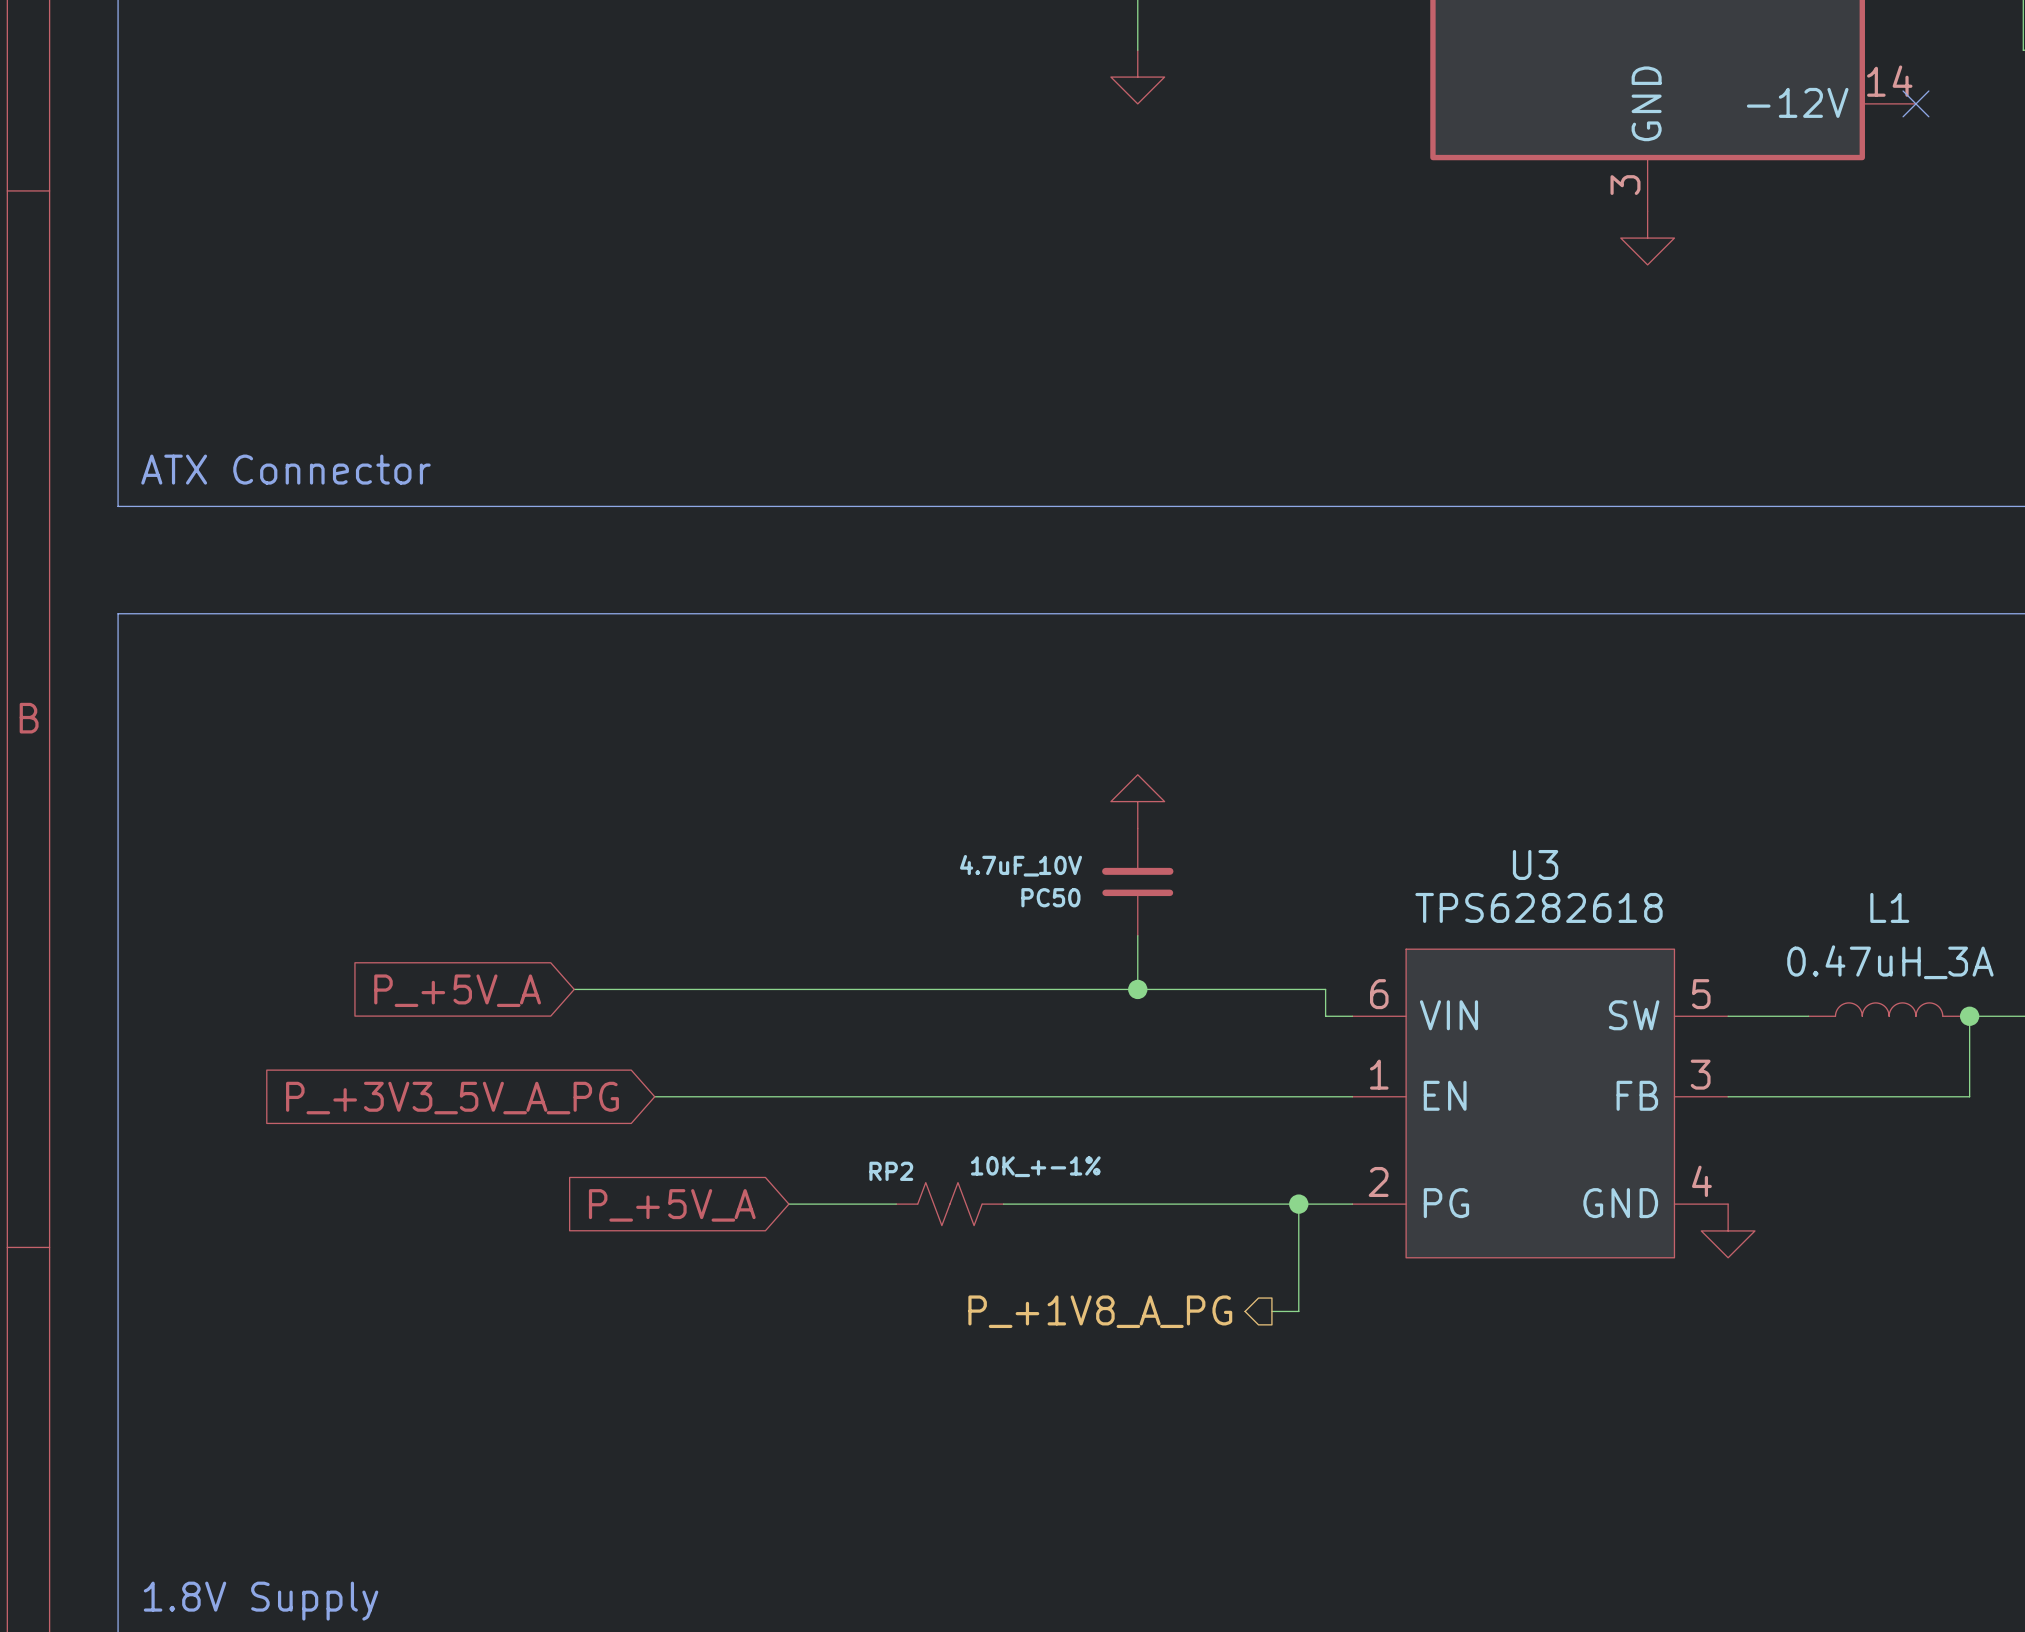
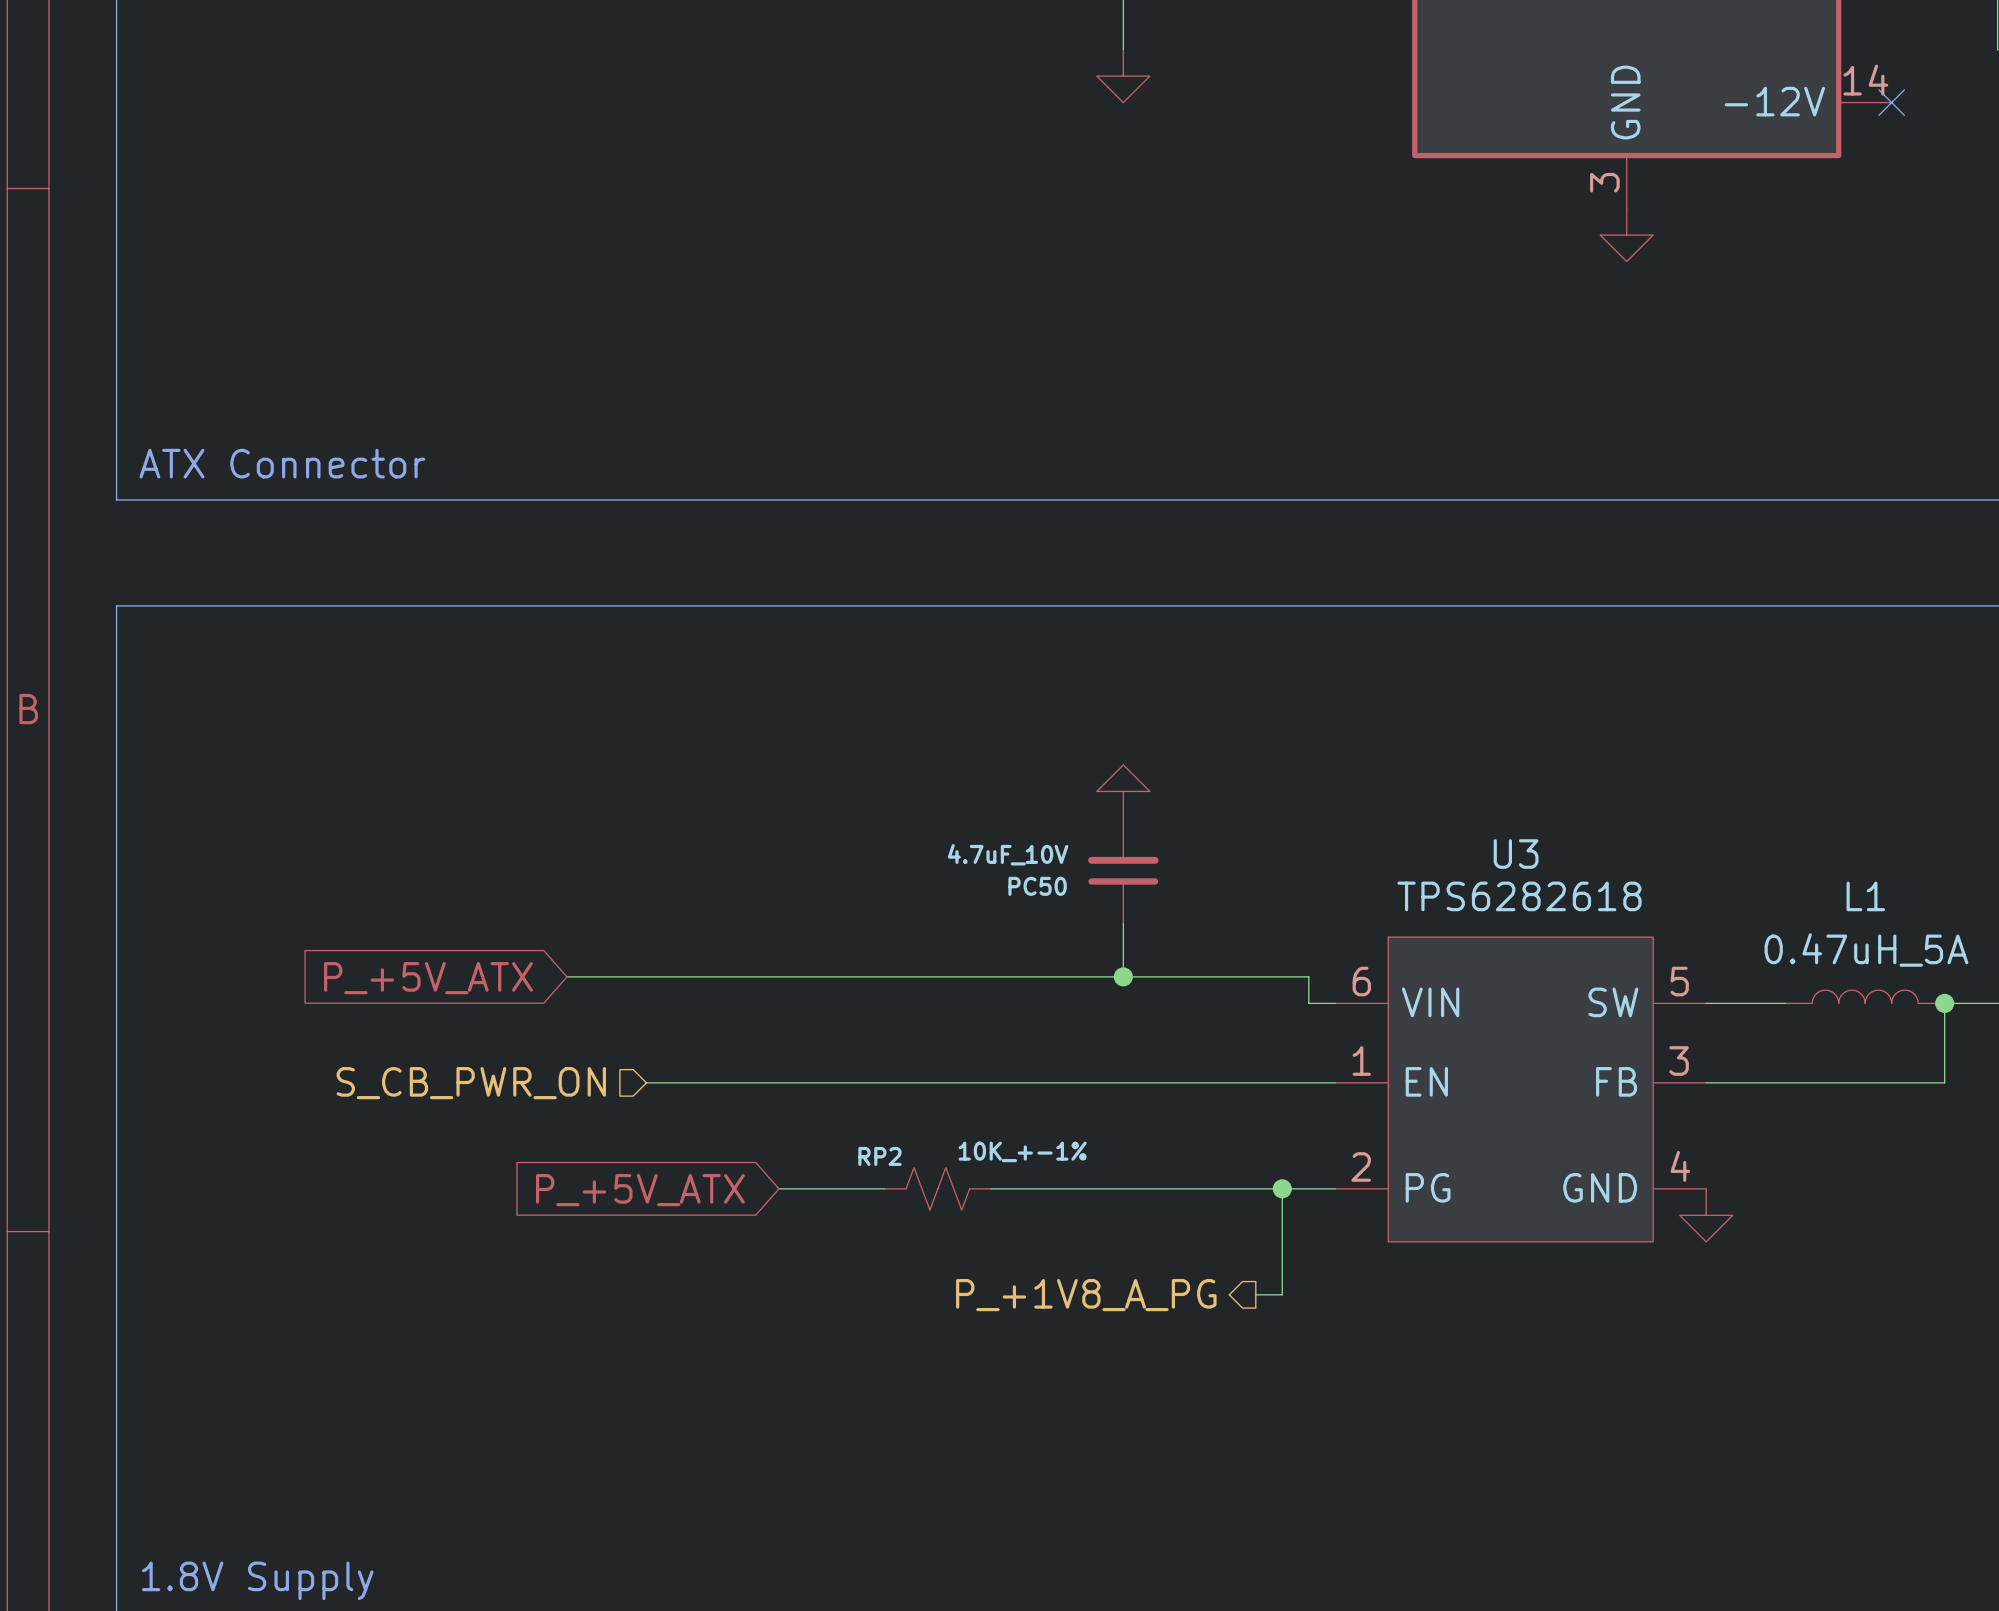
L1 value: 0.47uH_3A (1890, 962) -> 0.47uH_5A (1866, 950)
global label: P_+5V_A (457, 990) -> P_+5V_ATX (428, 978)
hierarchical label: none -> S_CB_PWR_ON (471, 1083)
global label: P_+3V3_5V_A_PG (452, 1098) -> none
global label: P_+5V_A (672, 1205) -> P_+5V_ATX (640, 1190)

